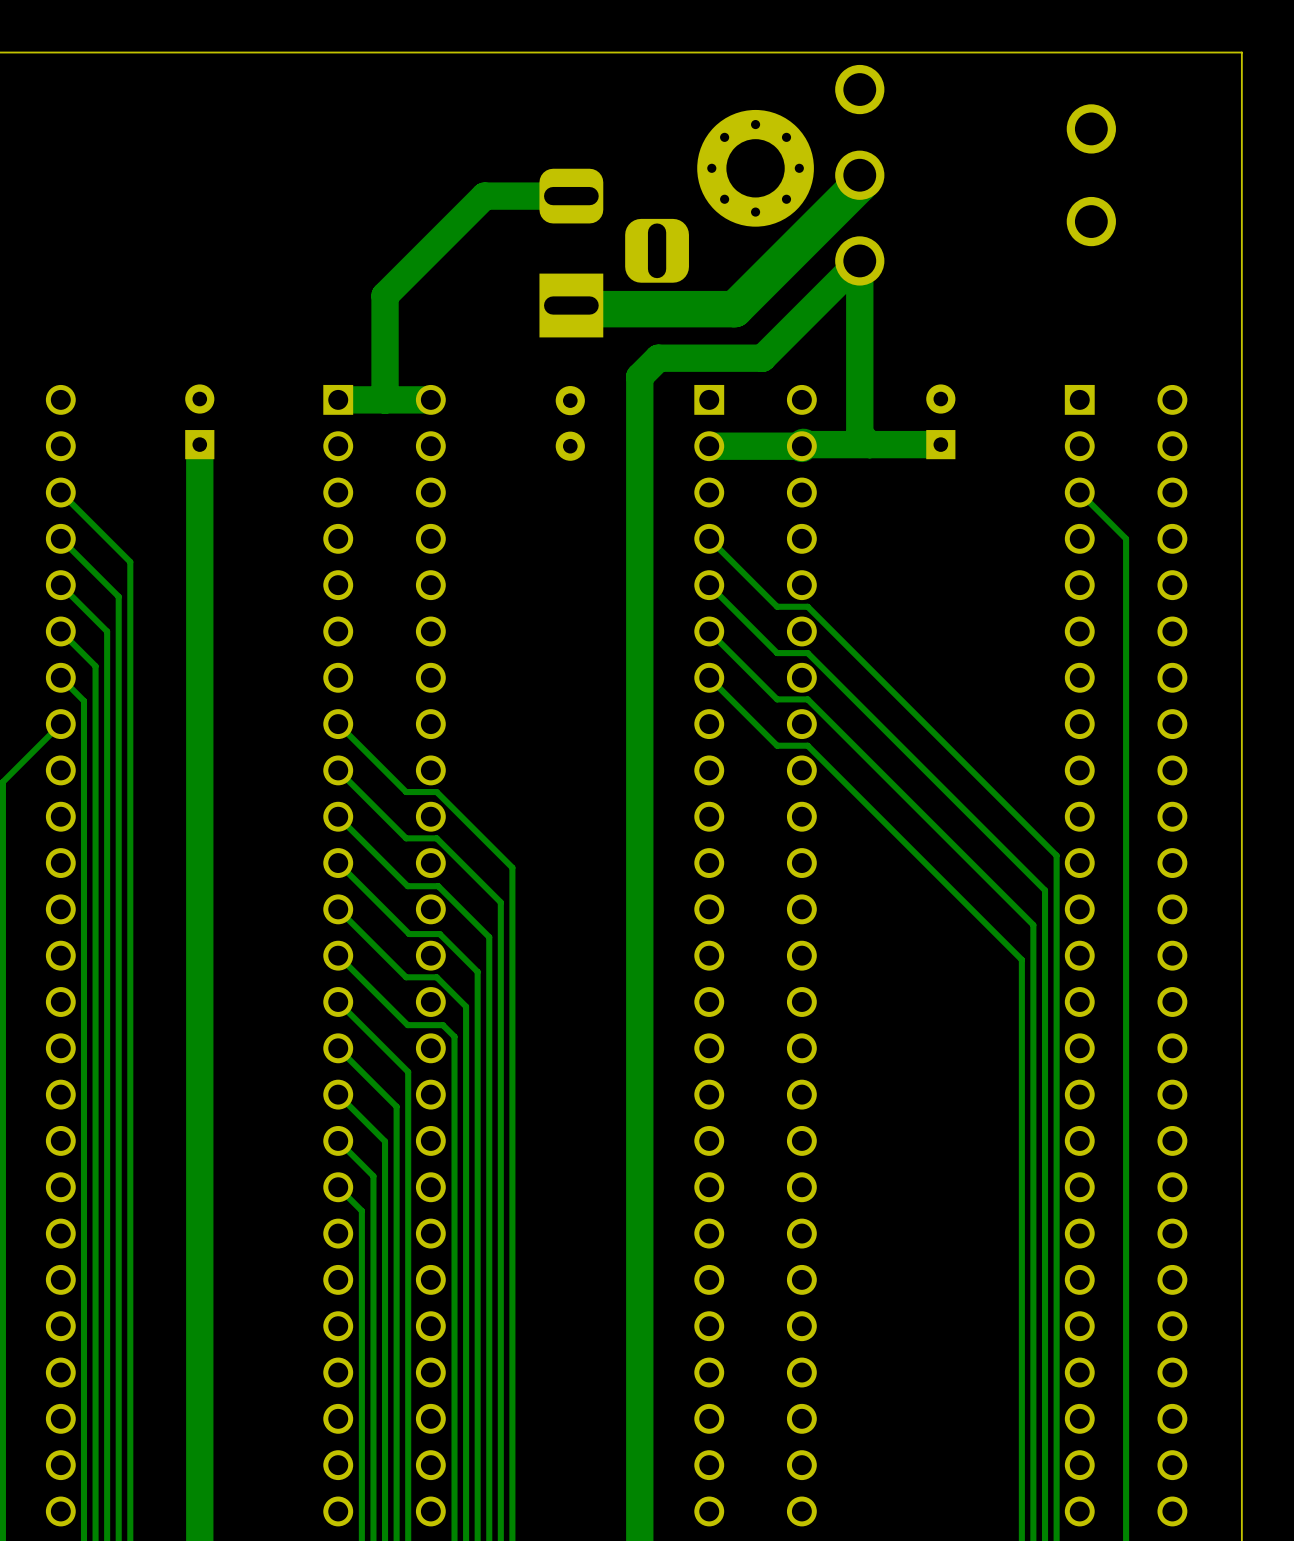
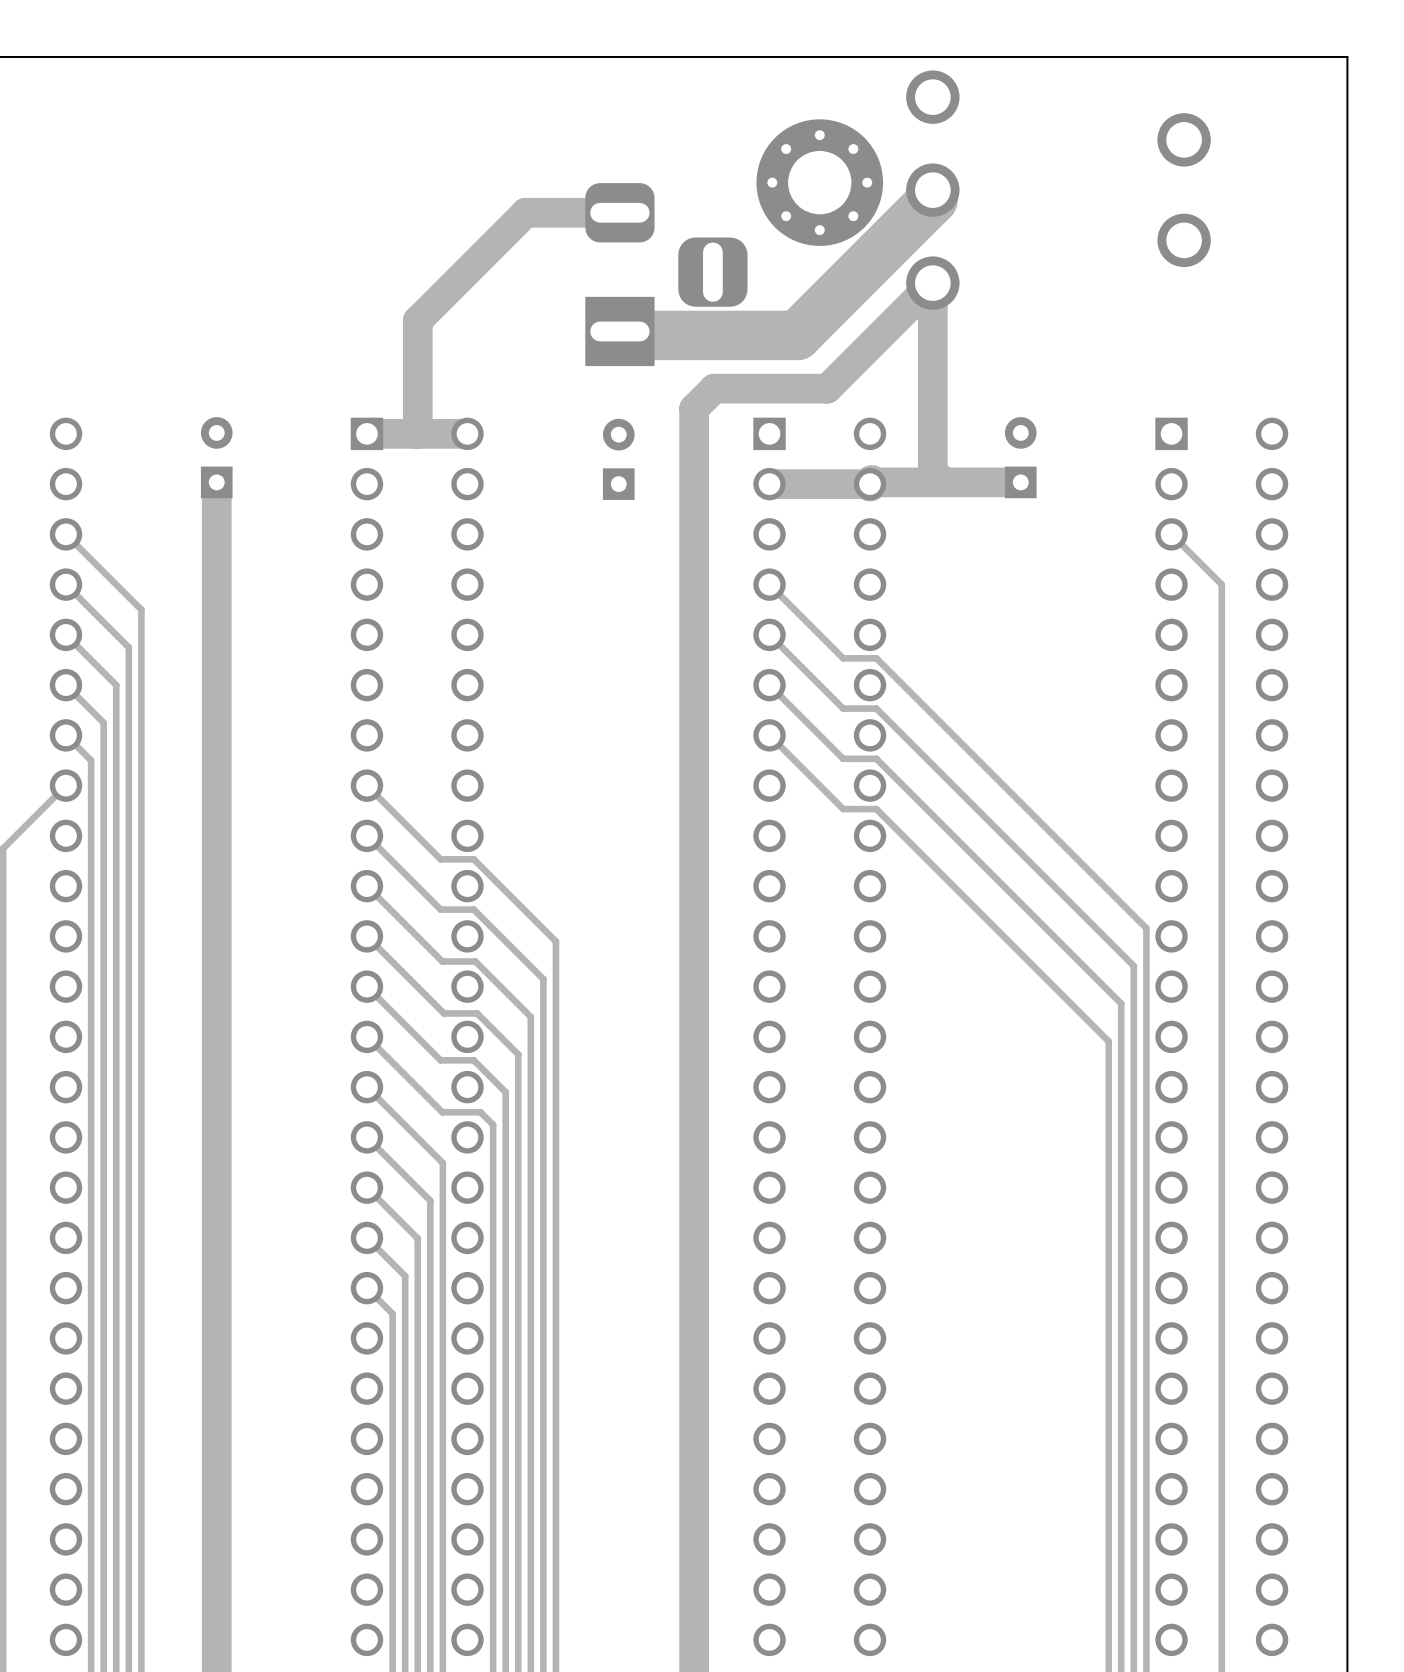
track width: thin (859, 175) (859, 184) (734, 309) (575, 309) -> thick (932, 190) (932, 199) (797, 335) (623, 335)
part footprint: [555, 386, 585, 461] -> [602, 418, 635, 500]

